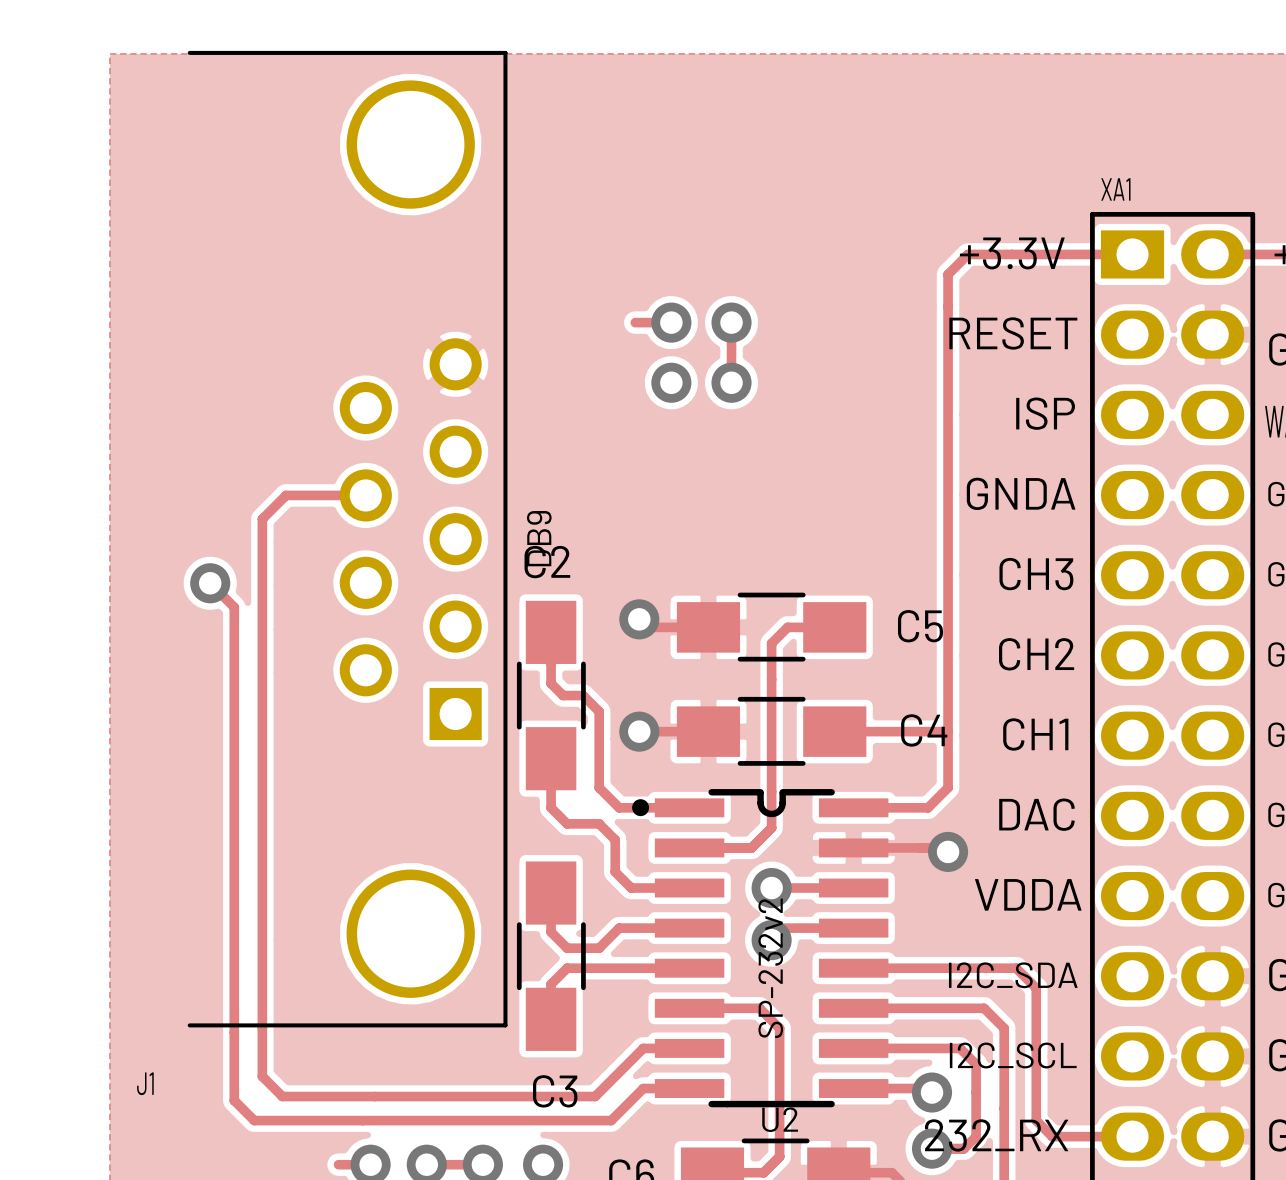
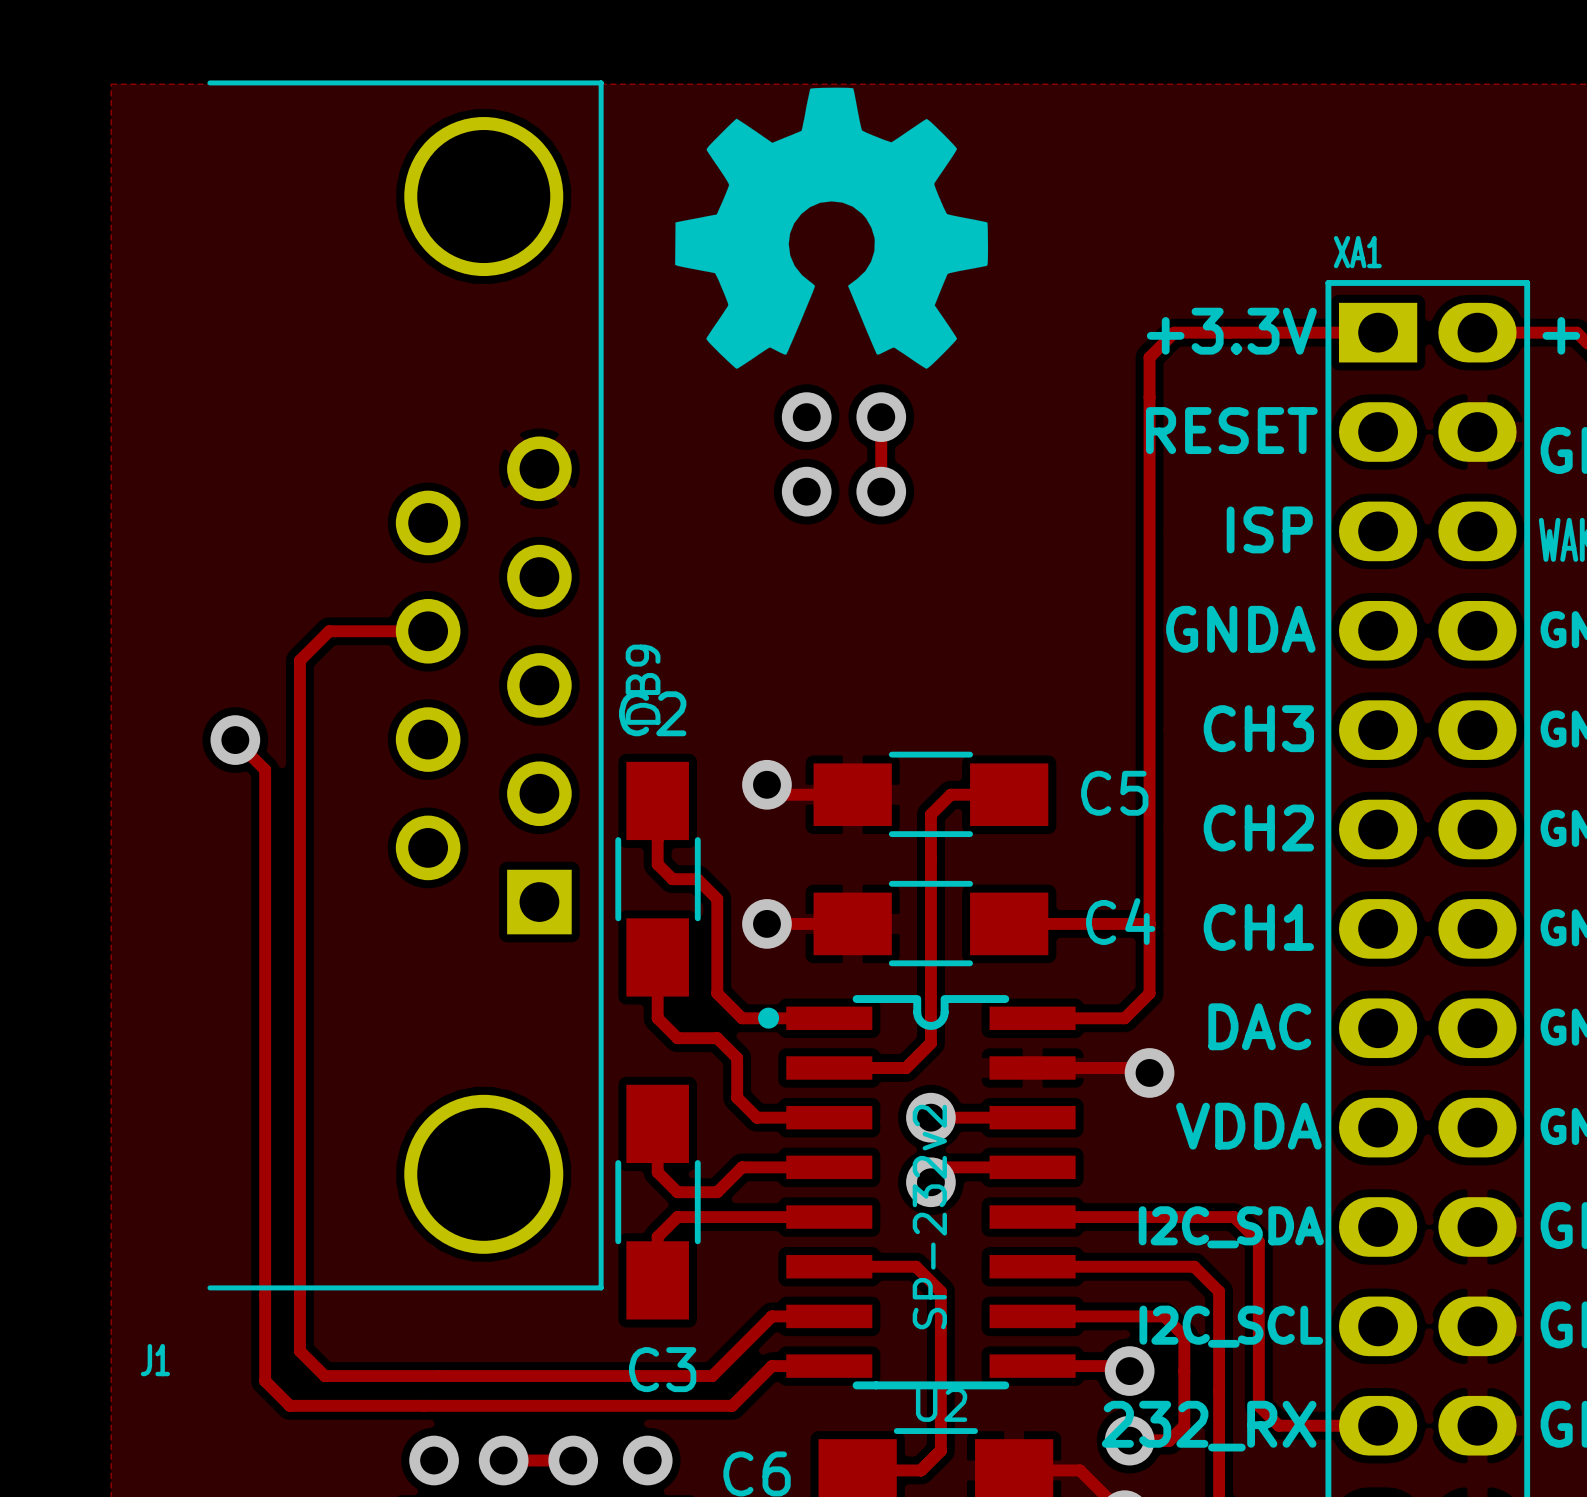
drawing: none -> [675, 87, 989, 369]
track: (635, 322) (671, 322) -> none
track: (338, 1164) (370, 1164) -> none

